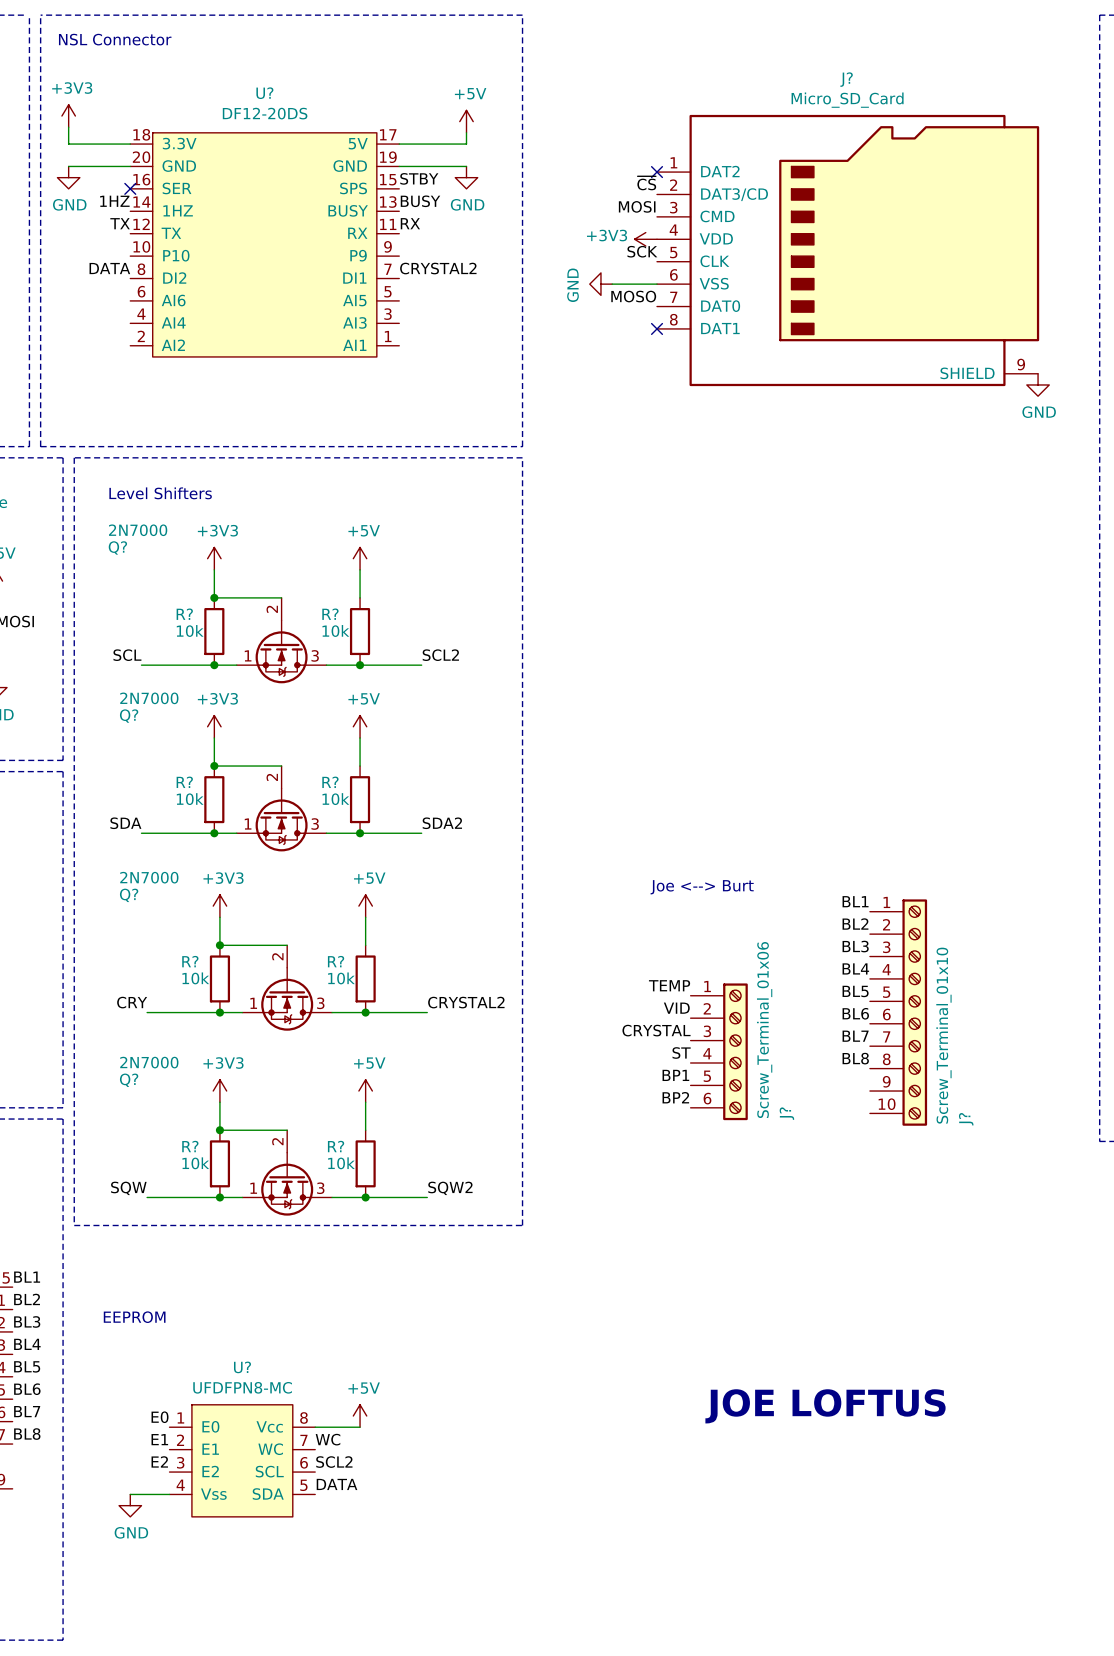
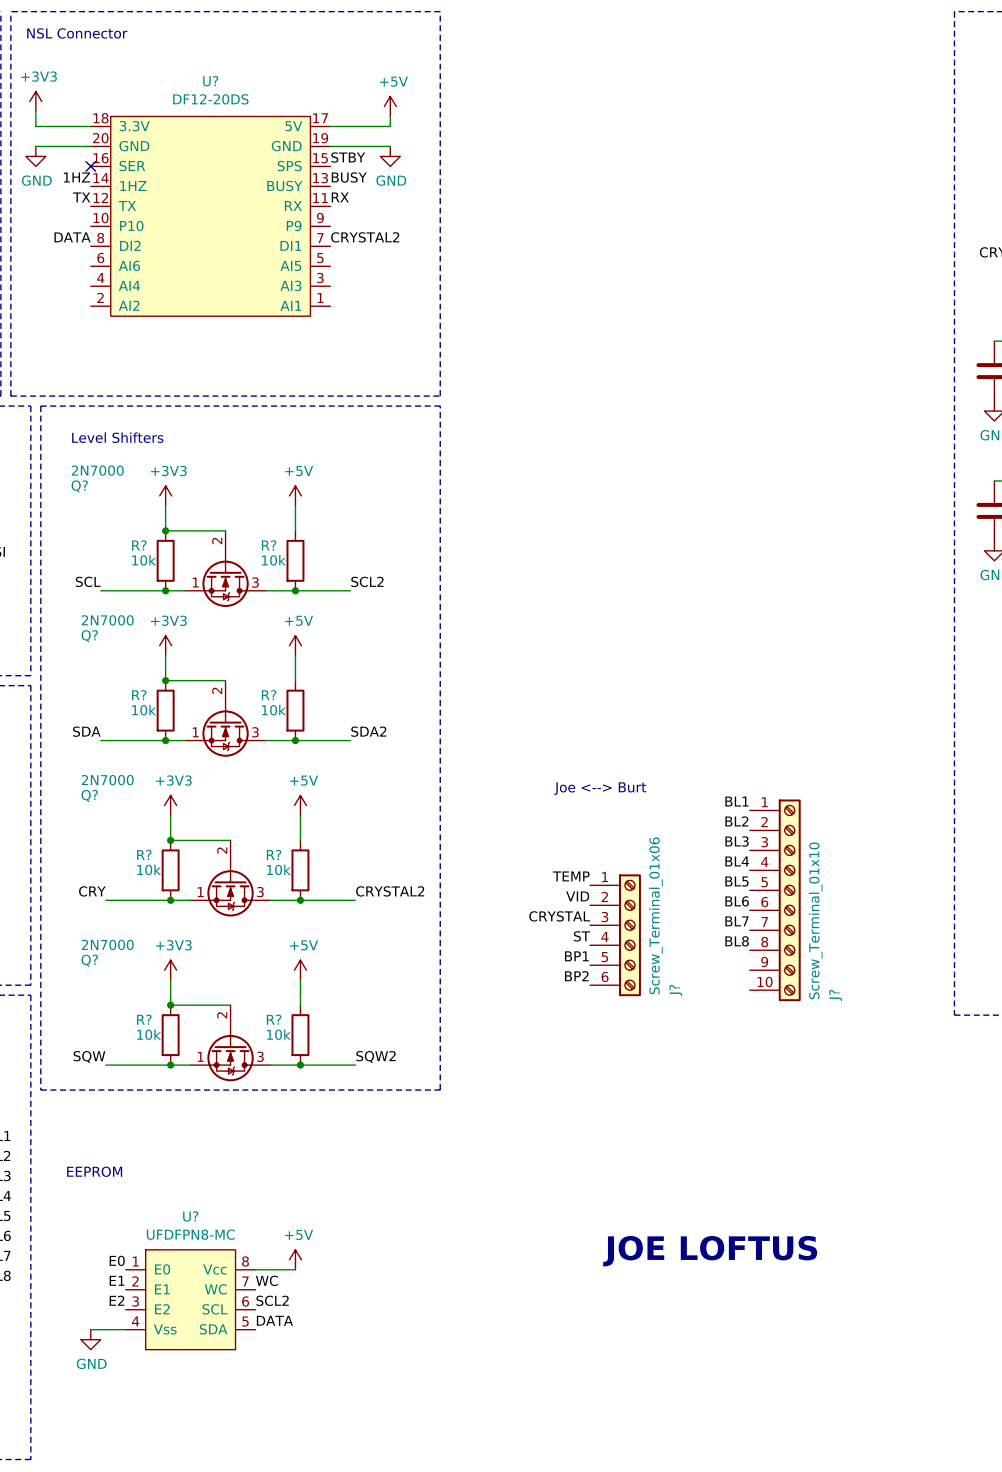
no-connect mark: (657, 172) -> none
label: ~{CS} (646, 183) -> none
label: MOSI (637, 206) -> none
power symbol: +3V3 (645, 239) -> none
J?: Micro_SD_Card (848, 250) -> none
label: SCK (642, 251) -> none
power symbol: GND (600, 284) -> none
wire: (612, 284) (657, 284) -> none
label: MOSO (633, 296) -> none
no-connect mark: (657, 328) -> none
power symbol: GND (1038, 384) -> none

